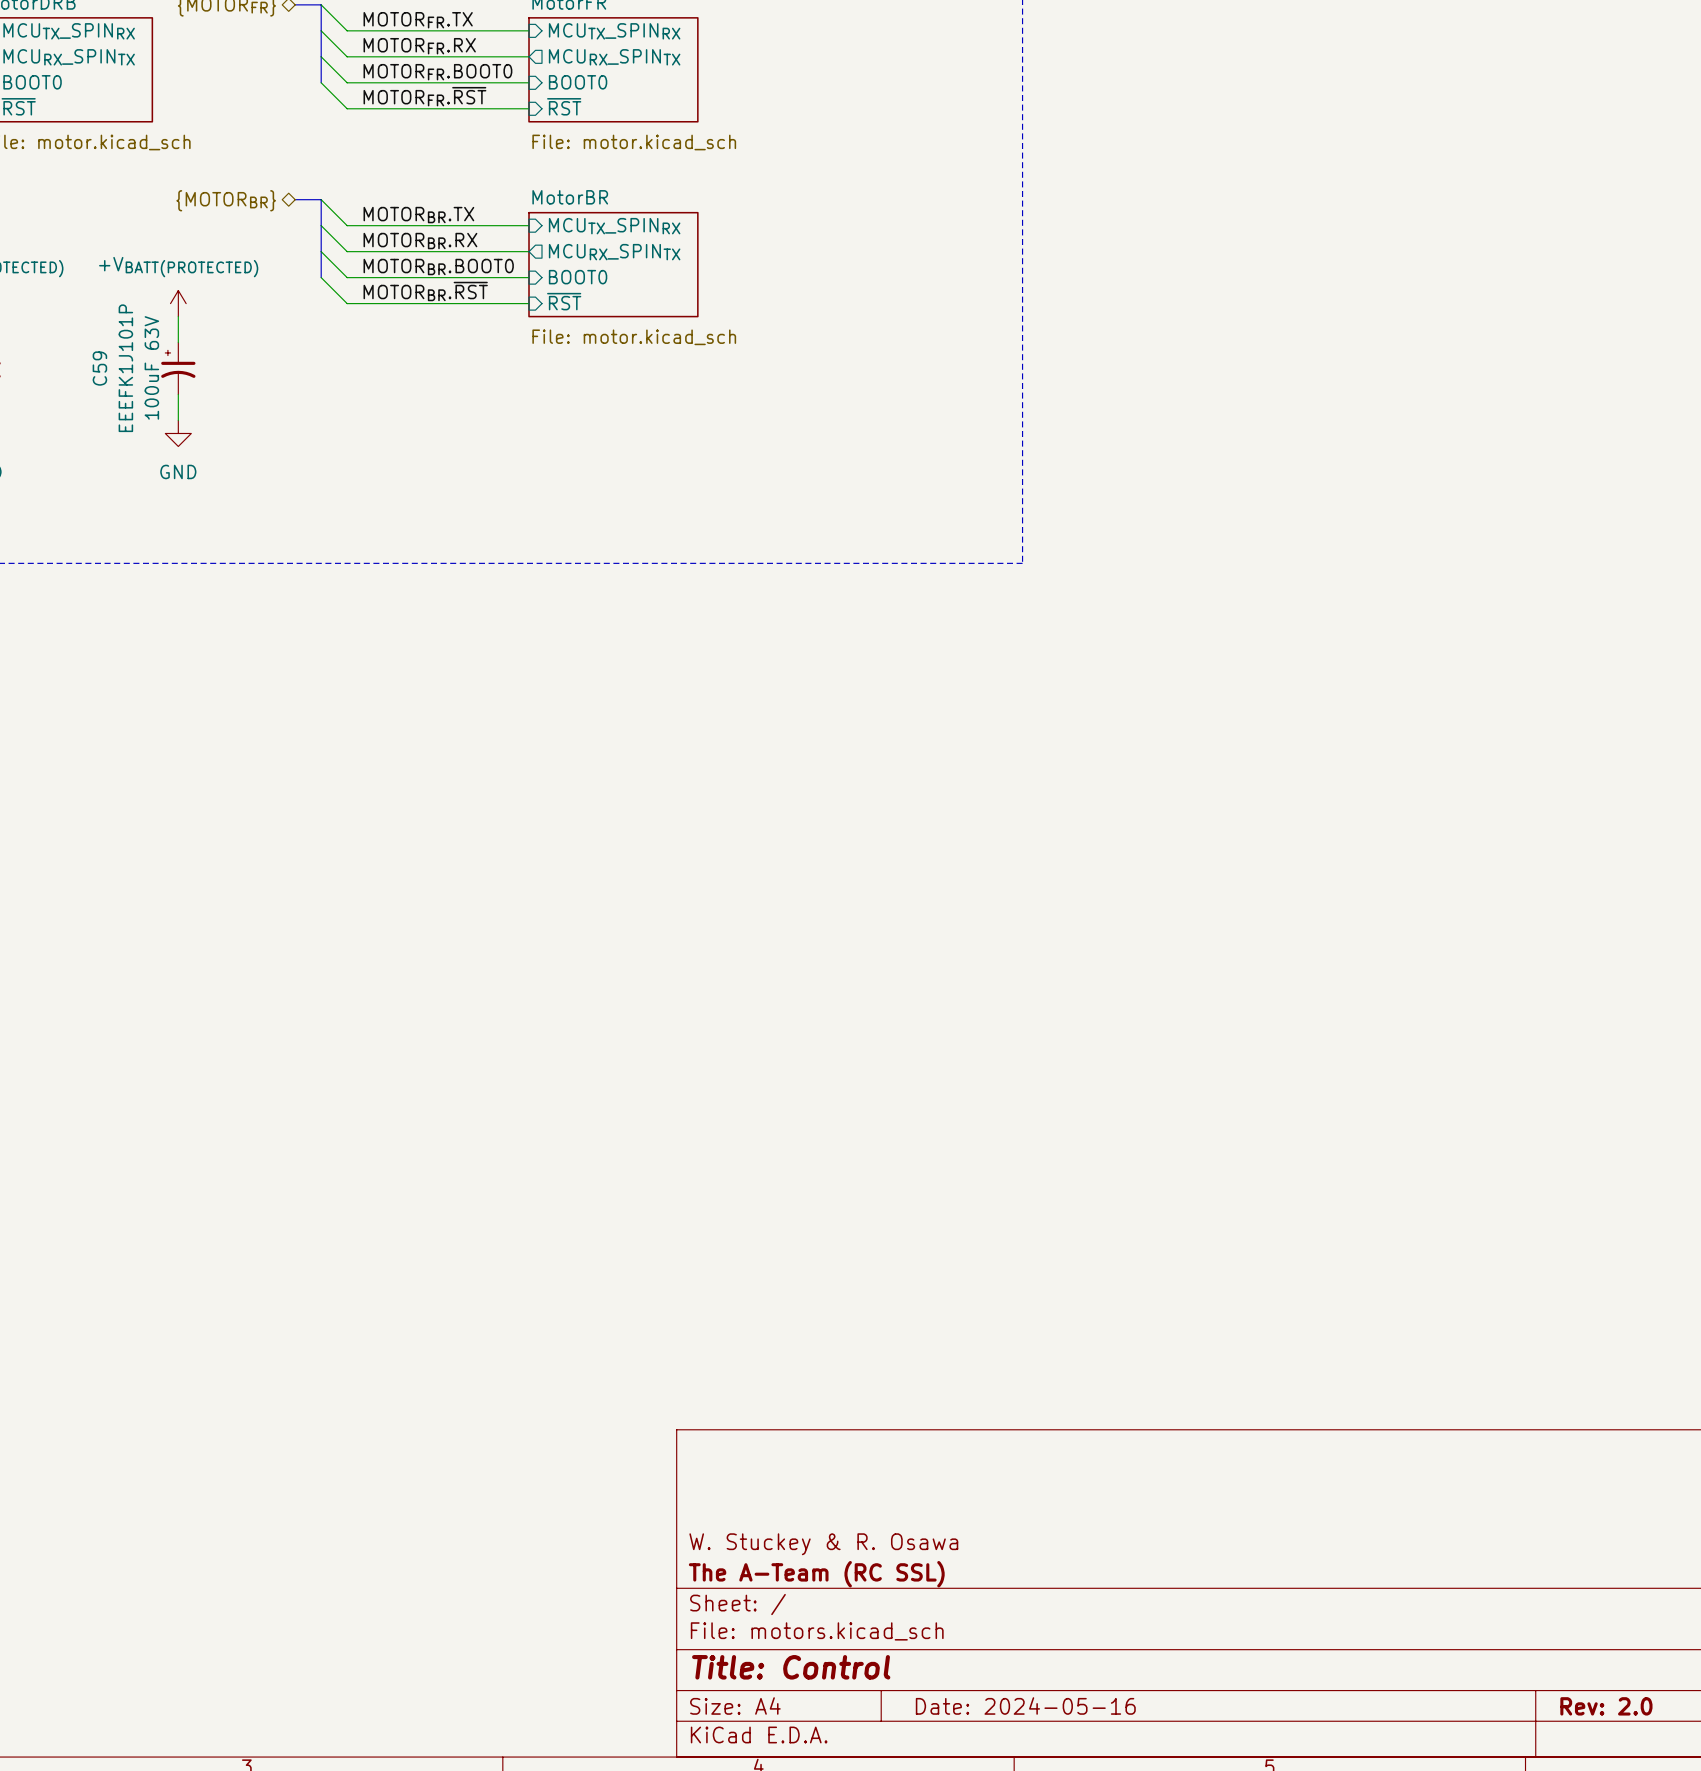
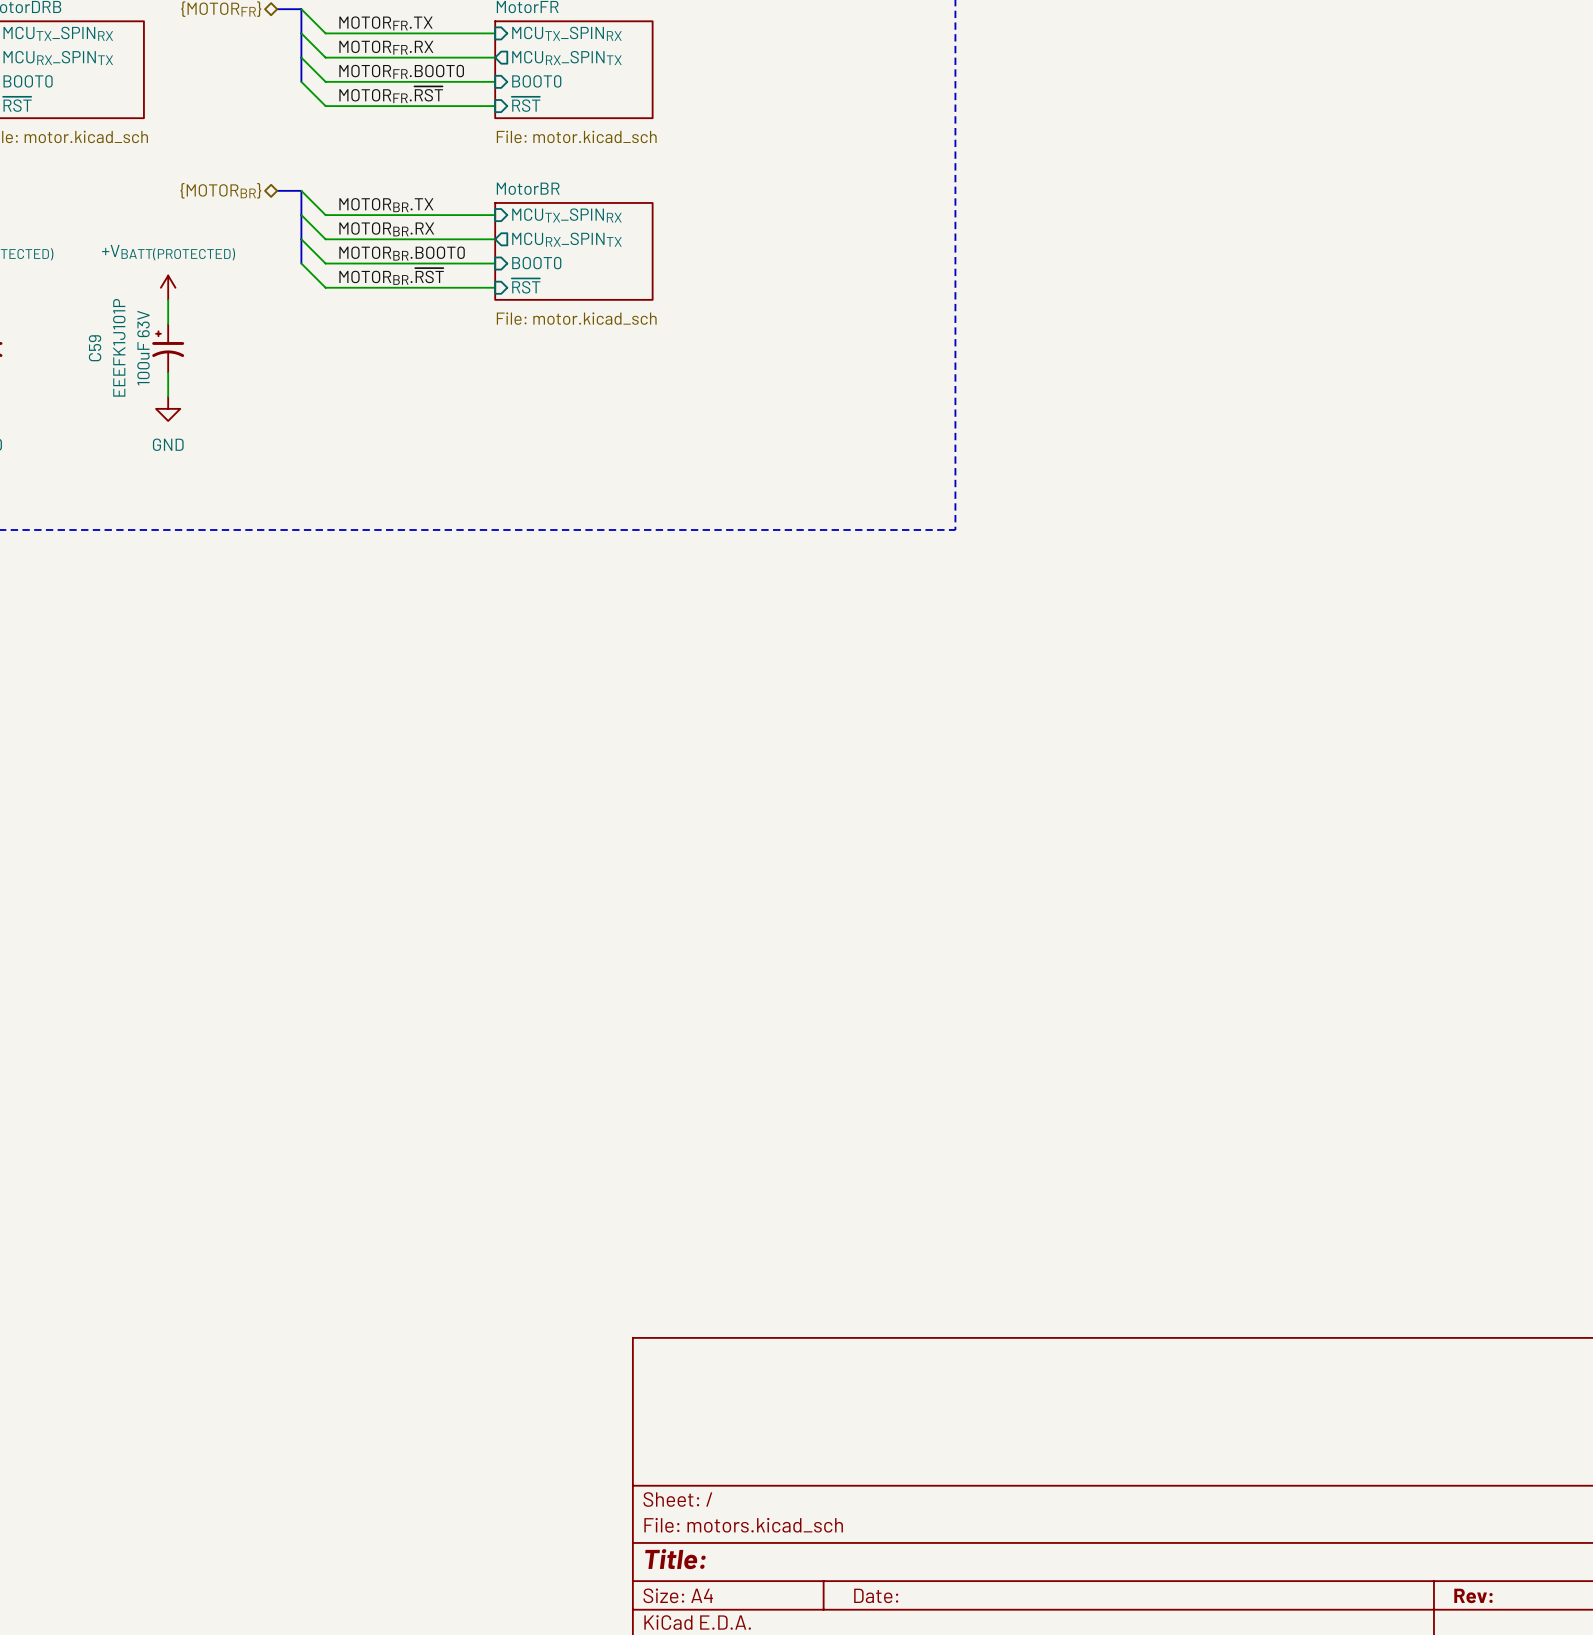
title block: W. Stuckey & R. Osawa (823, 1544) -> none
title block: The A-Team (RC SSL) (816, 1574) -> none
title block: Title: Control (791, 1667) -> Title: (675, 1559)
title block: Date: 2024-05-16 (1025, 1705) -> Date: (876, 1595)
title block: Rev: 2.0 (1606, 1706) -> Rev: (1473, 1595)

